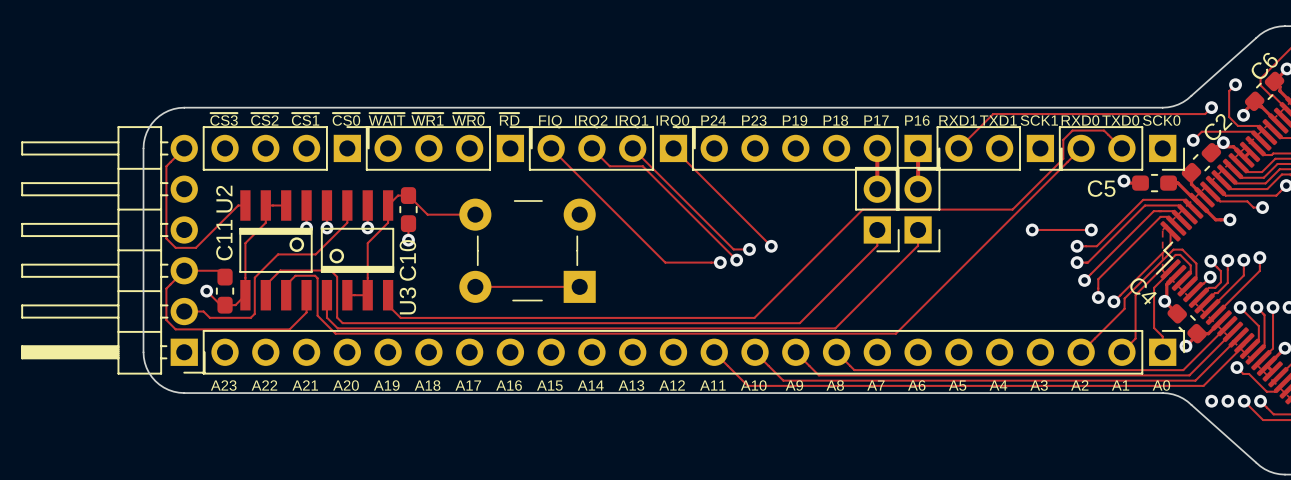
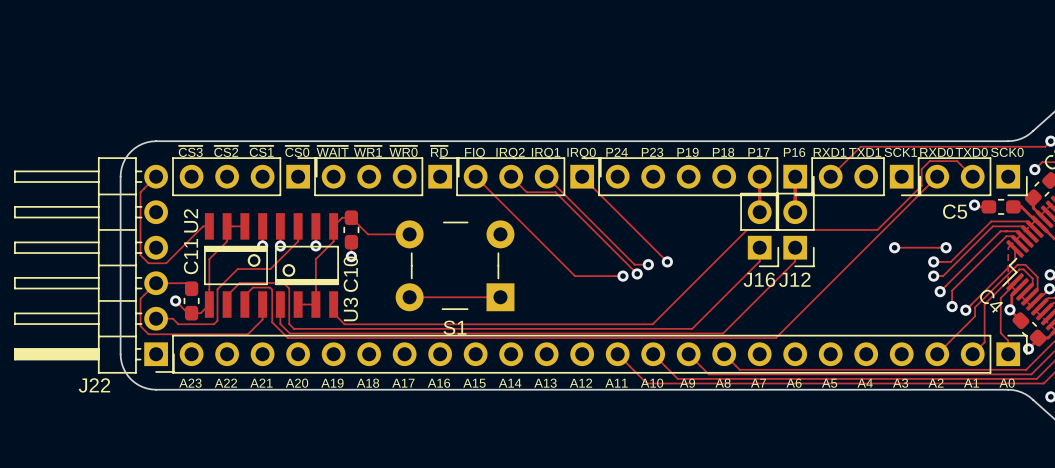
J16 name: none -> J16 (759, 279)
J12 name: none -> J12 (794, 279)
S1 name: none -> S1 (455, 327)
J22 name: none -> J22 (94, 385)

